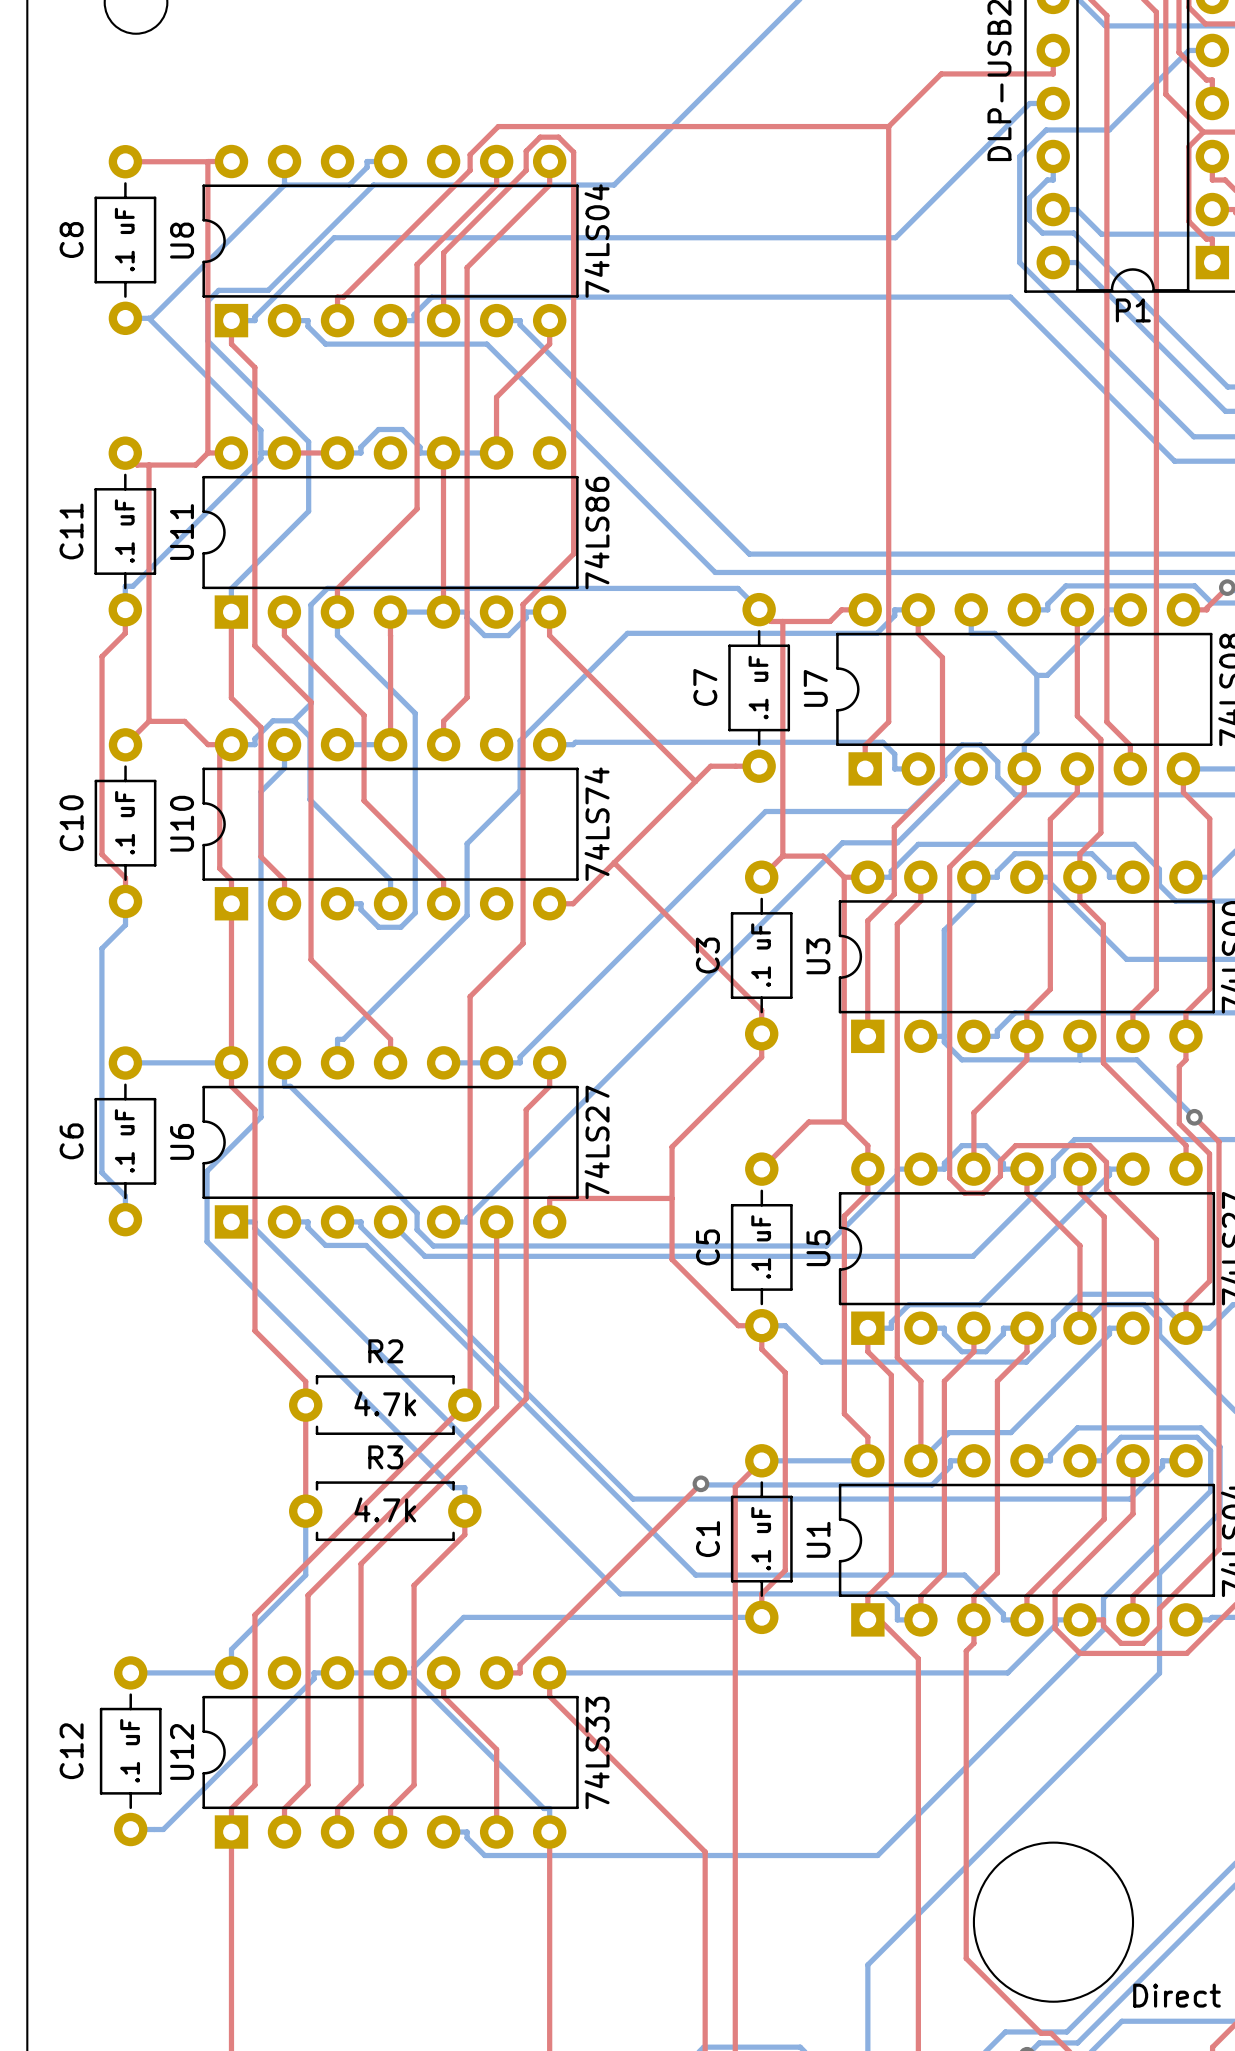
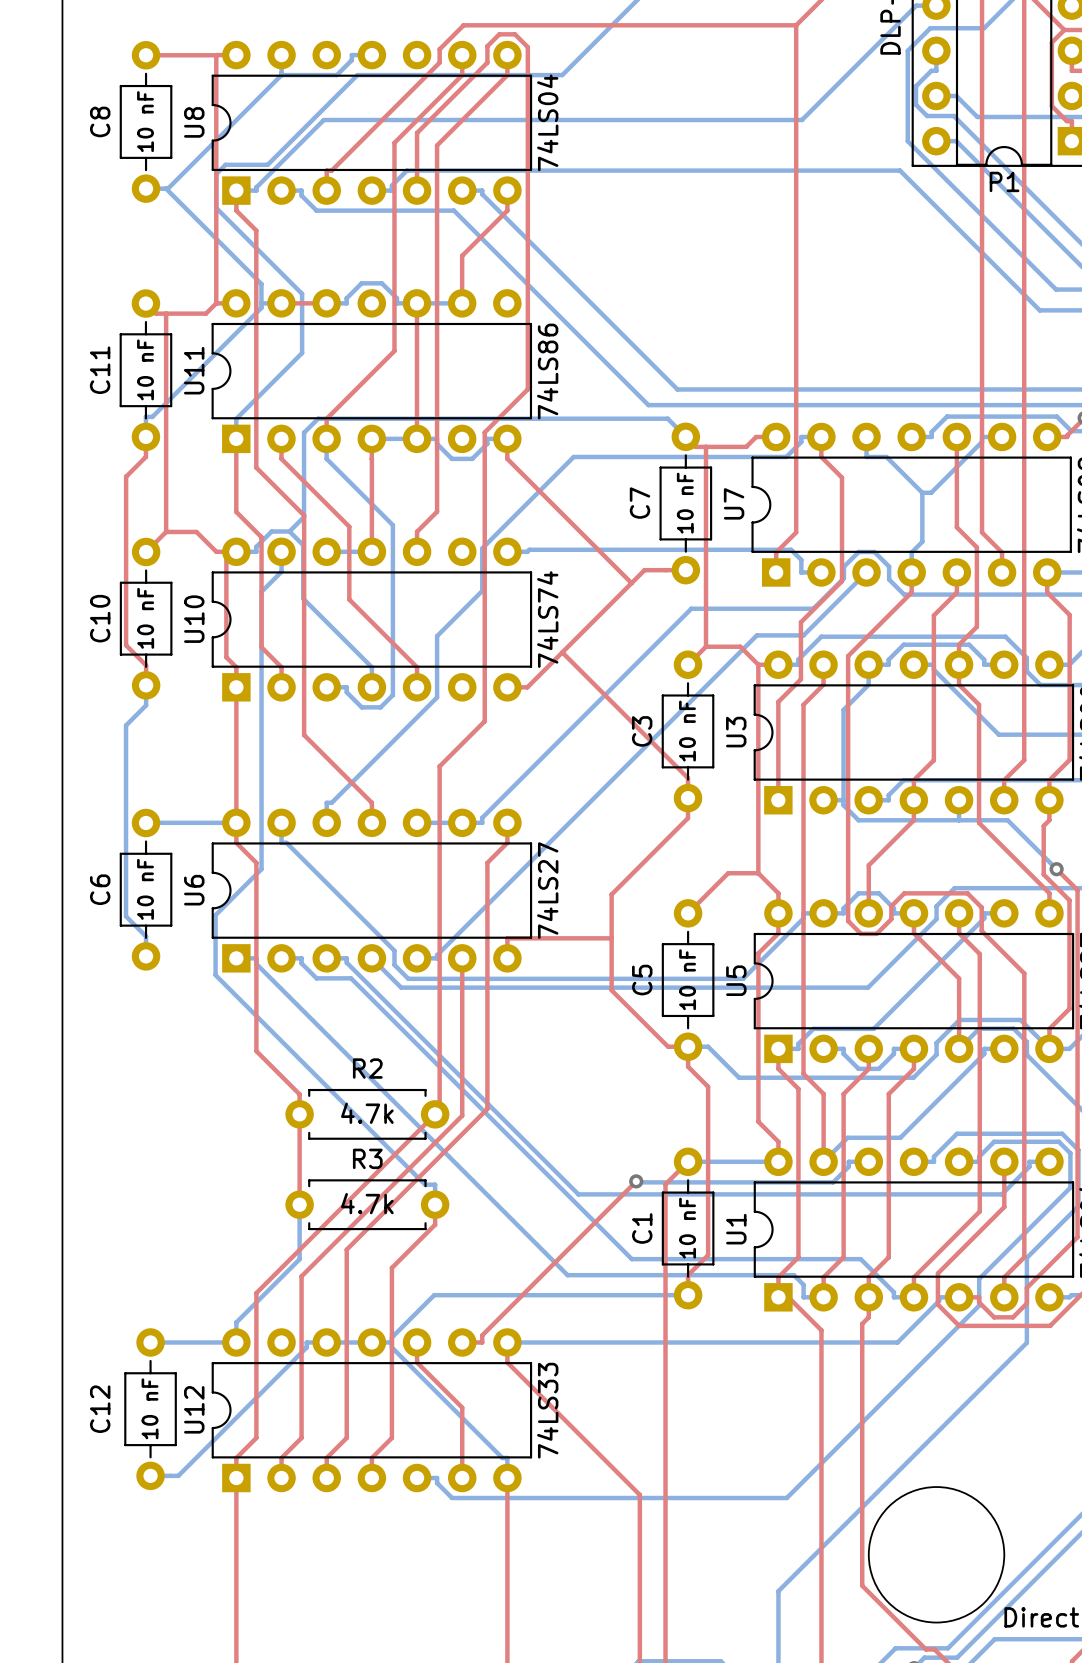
C8 value: .1 uF (124, 239) -> 10 nF (145, 121)
C11 value: .1 uF (124, 531) -> 10 nF (145, 369)
C7 value: .1 uF (758, 687) -> 10 nF (685, 503)
C10 value: .1 uF (125, 822) -> 10 nF (145, 618)
C3 value: .1 uF (761, 955) -> 10 nF (687, 731)
C6 value: .1 uF (124, 1140) -> 10 nF (145, 889)
C5 value: .1 uF (761, 1247) -> 10 nF (687, 979)
C1 value: .1 uF (761, 1538) -> 10 nF (687, 1228)
C12 value: .1 uF (130, 1750) -> 10 nF (150, 1408)

